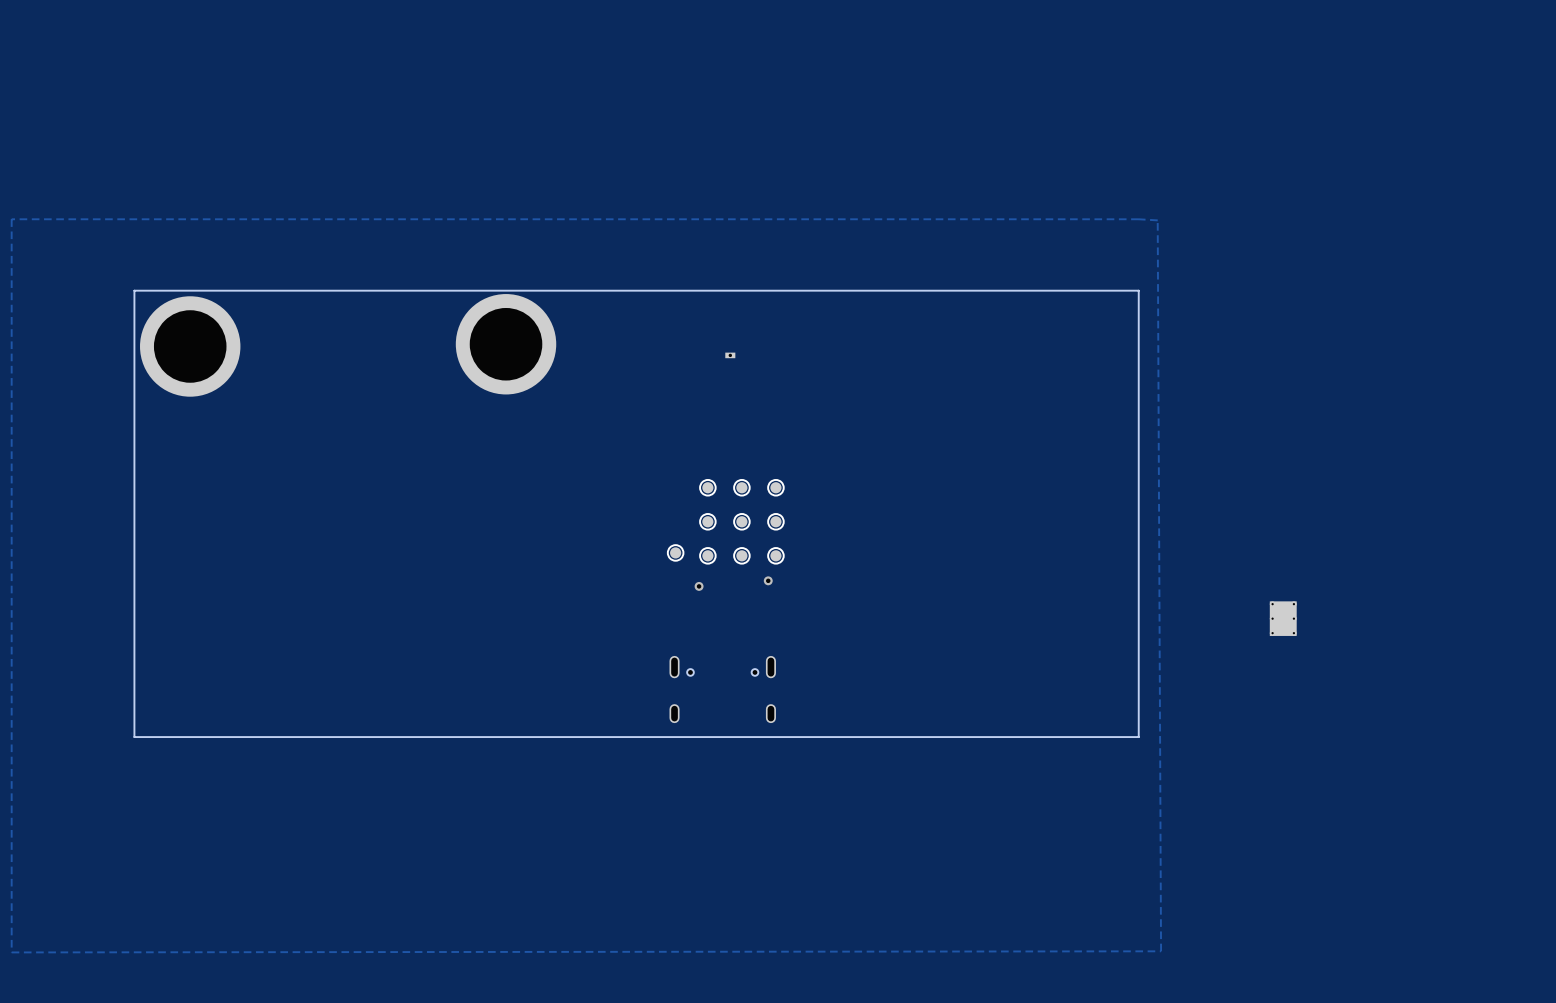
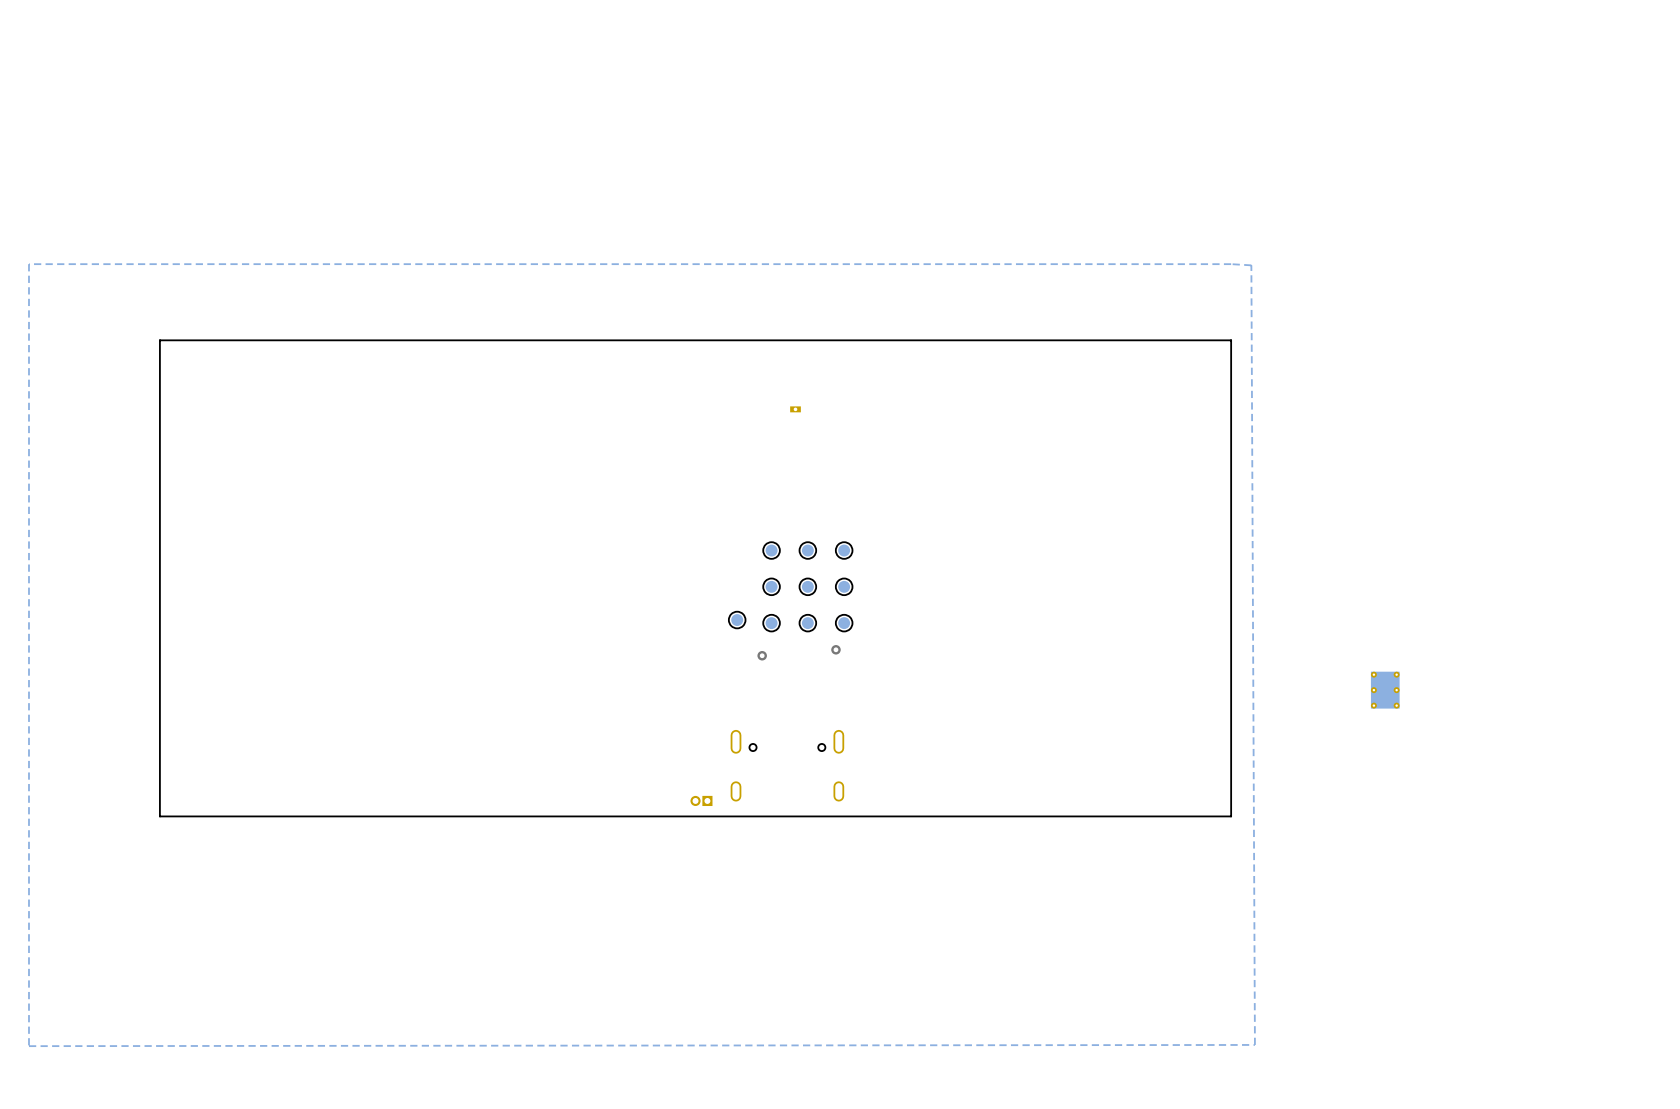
part: (506, 344) -> none
part: (190, 346) -> none
part: none -> (701, 800)

